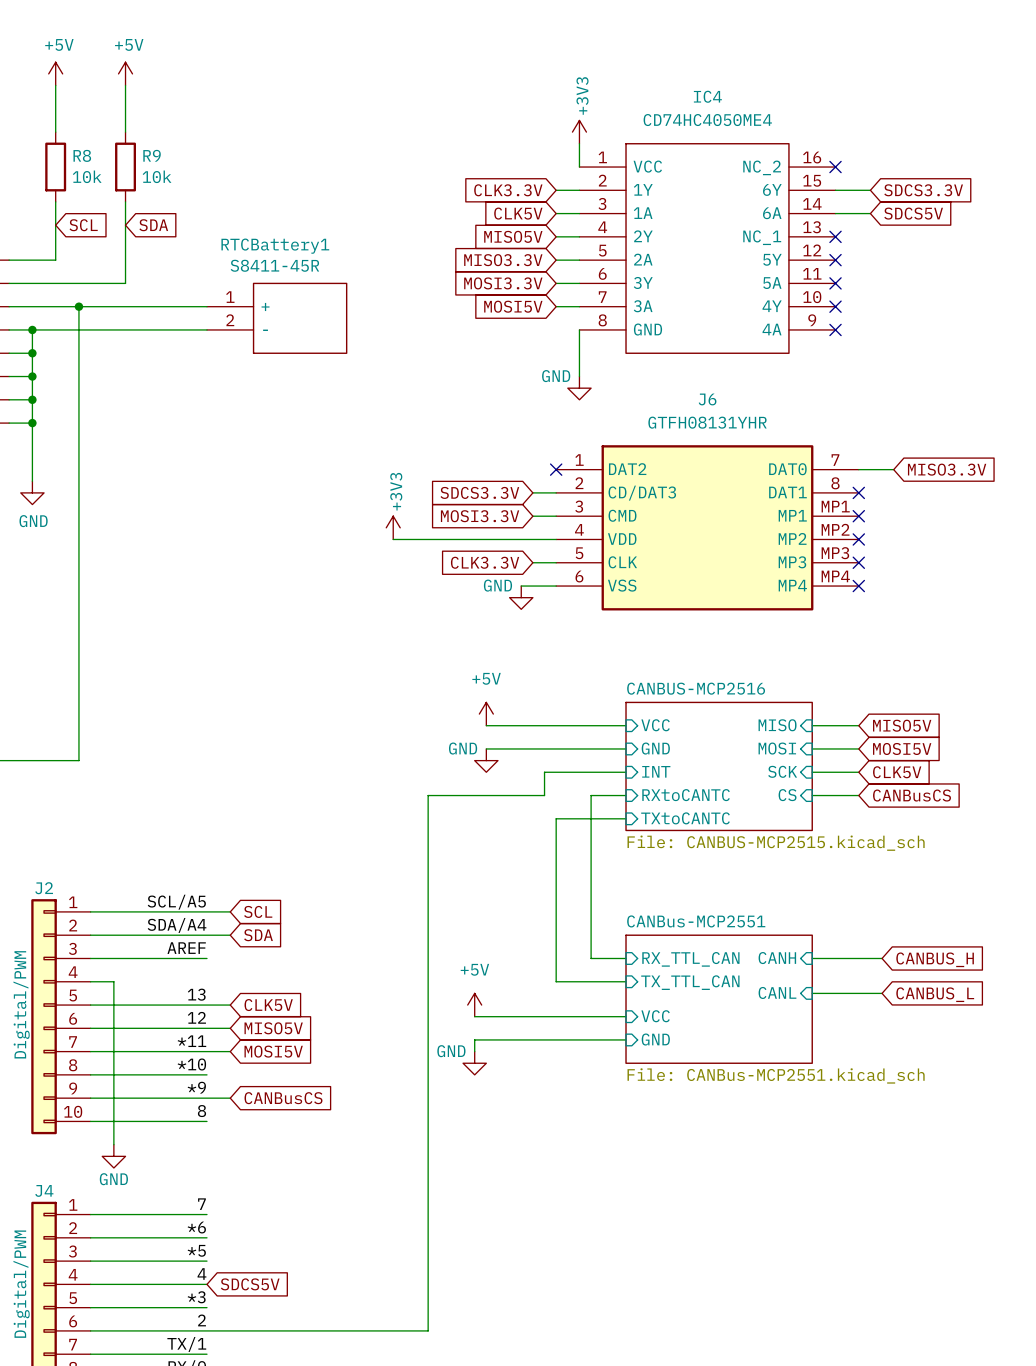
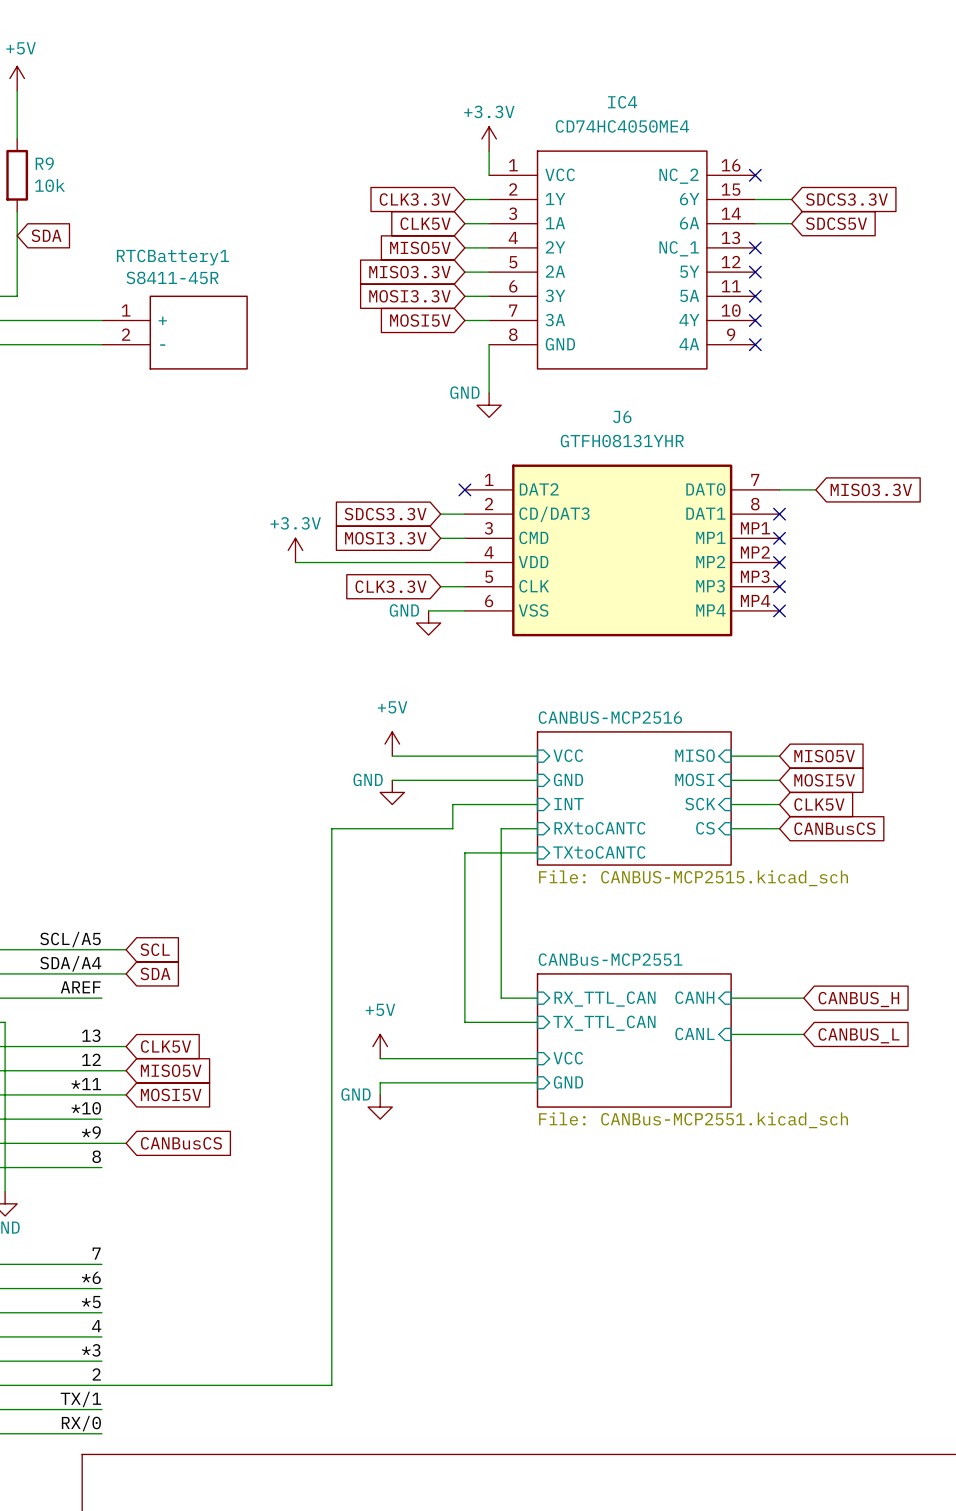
power symbol: +3V3 (579, 132) -> +3.3V (489, 139)
power symbol: +3V3 (393, 527) -> +3.3V (295, 550)
global label: SDCS5V (250, 1284) -> none

